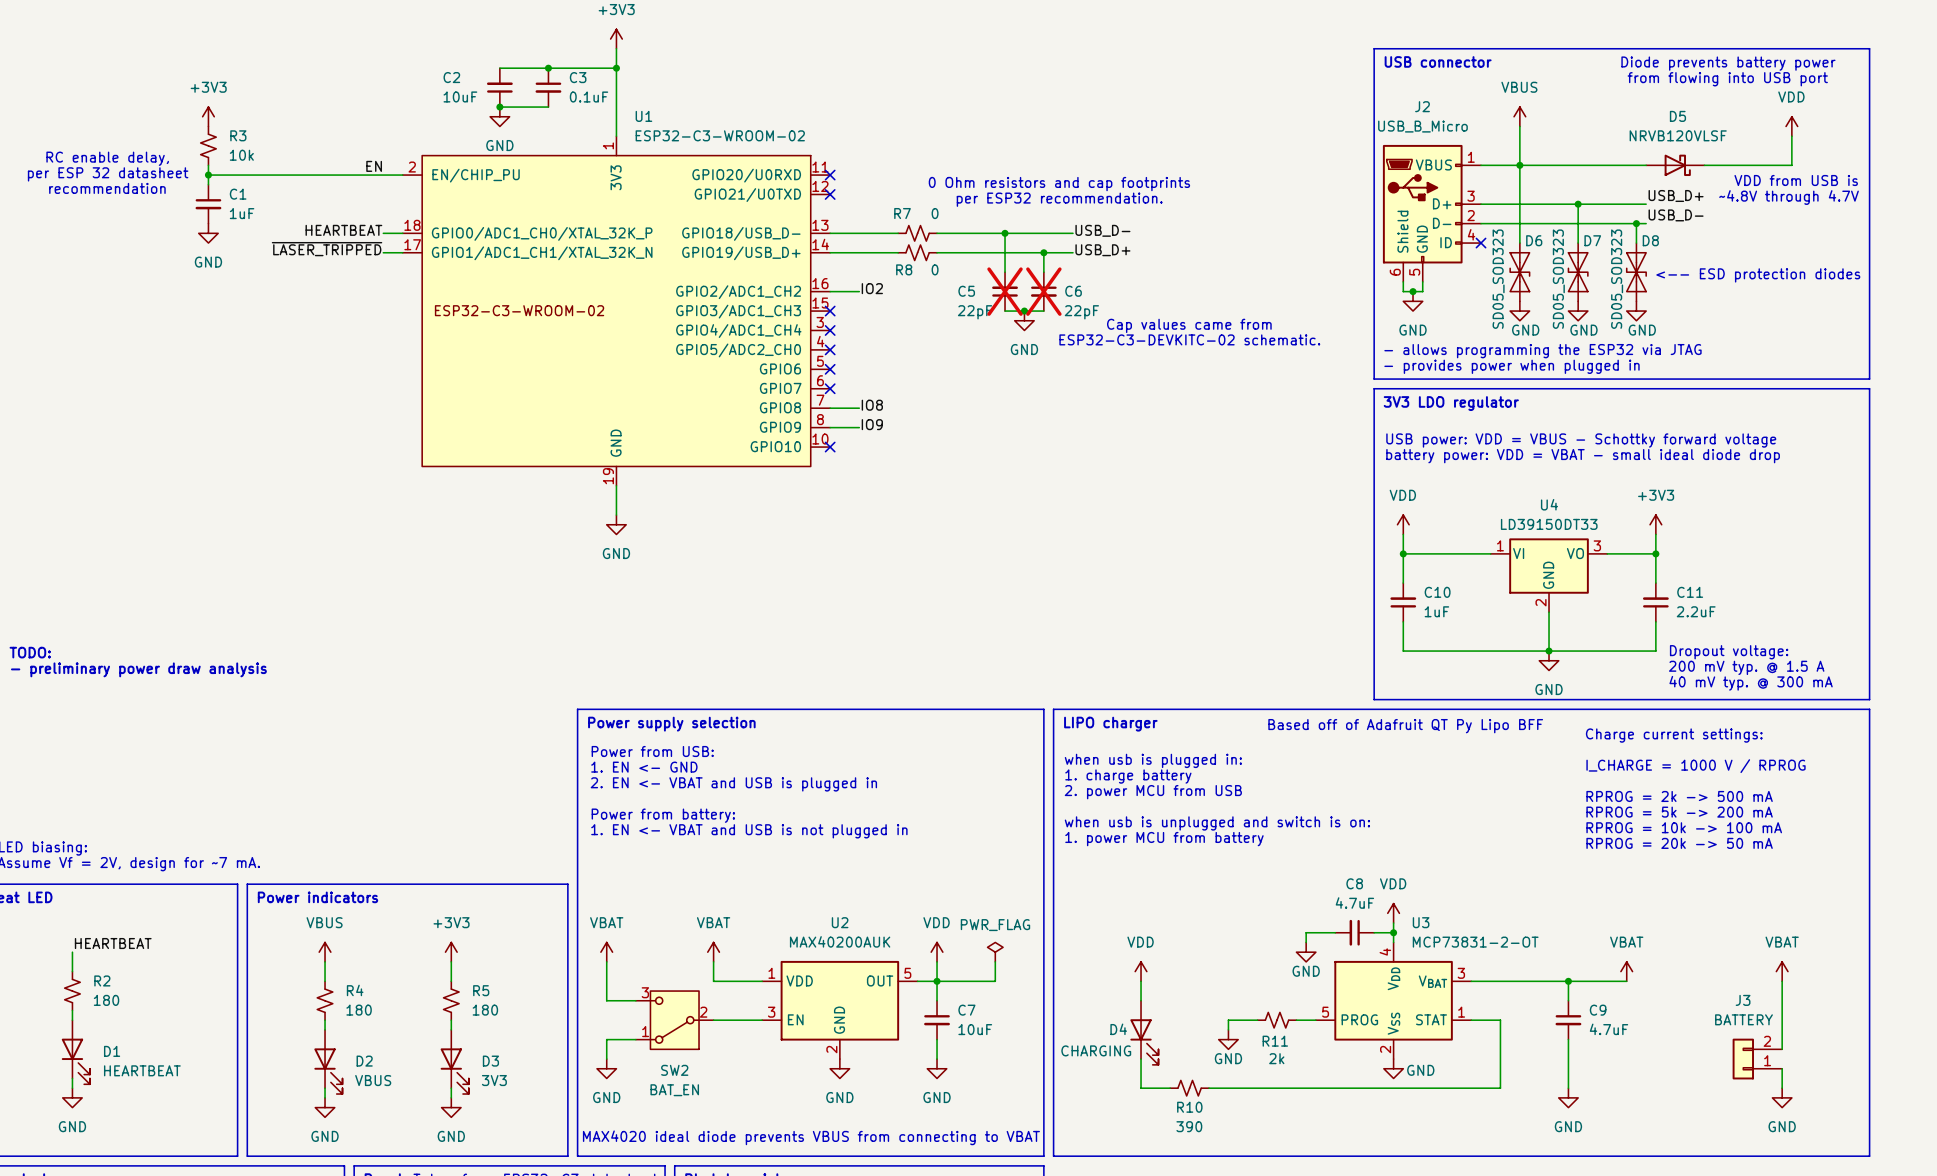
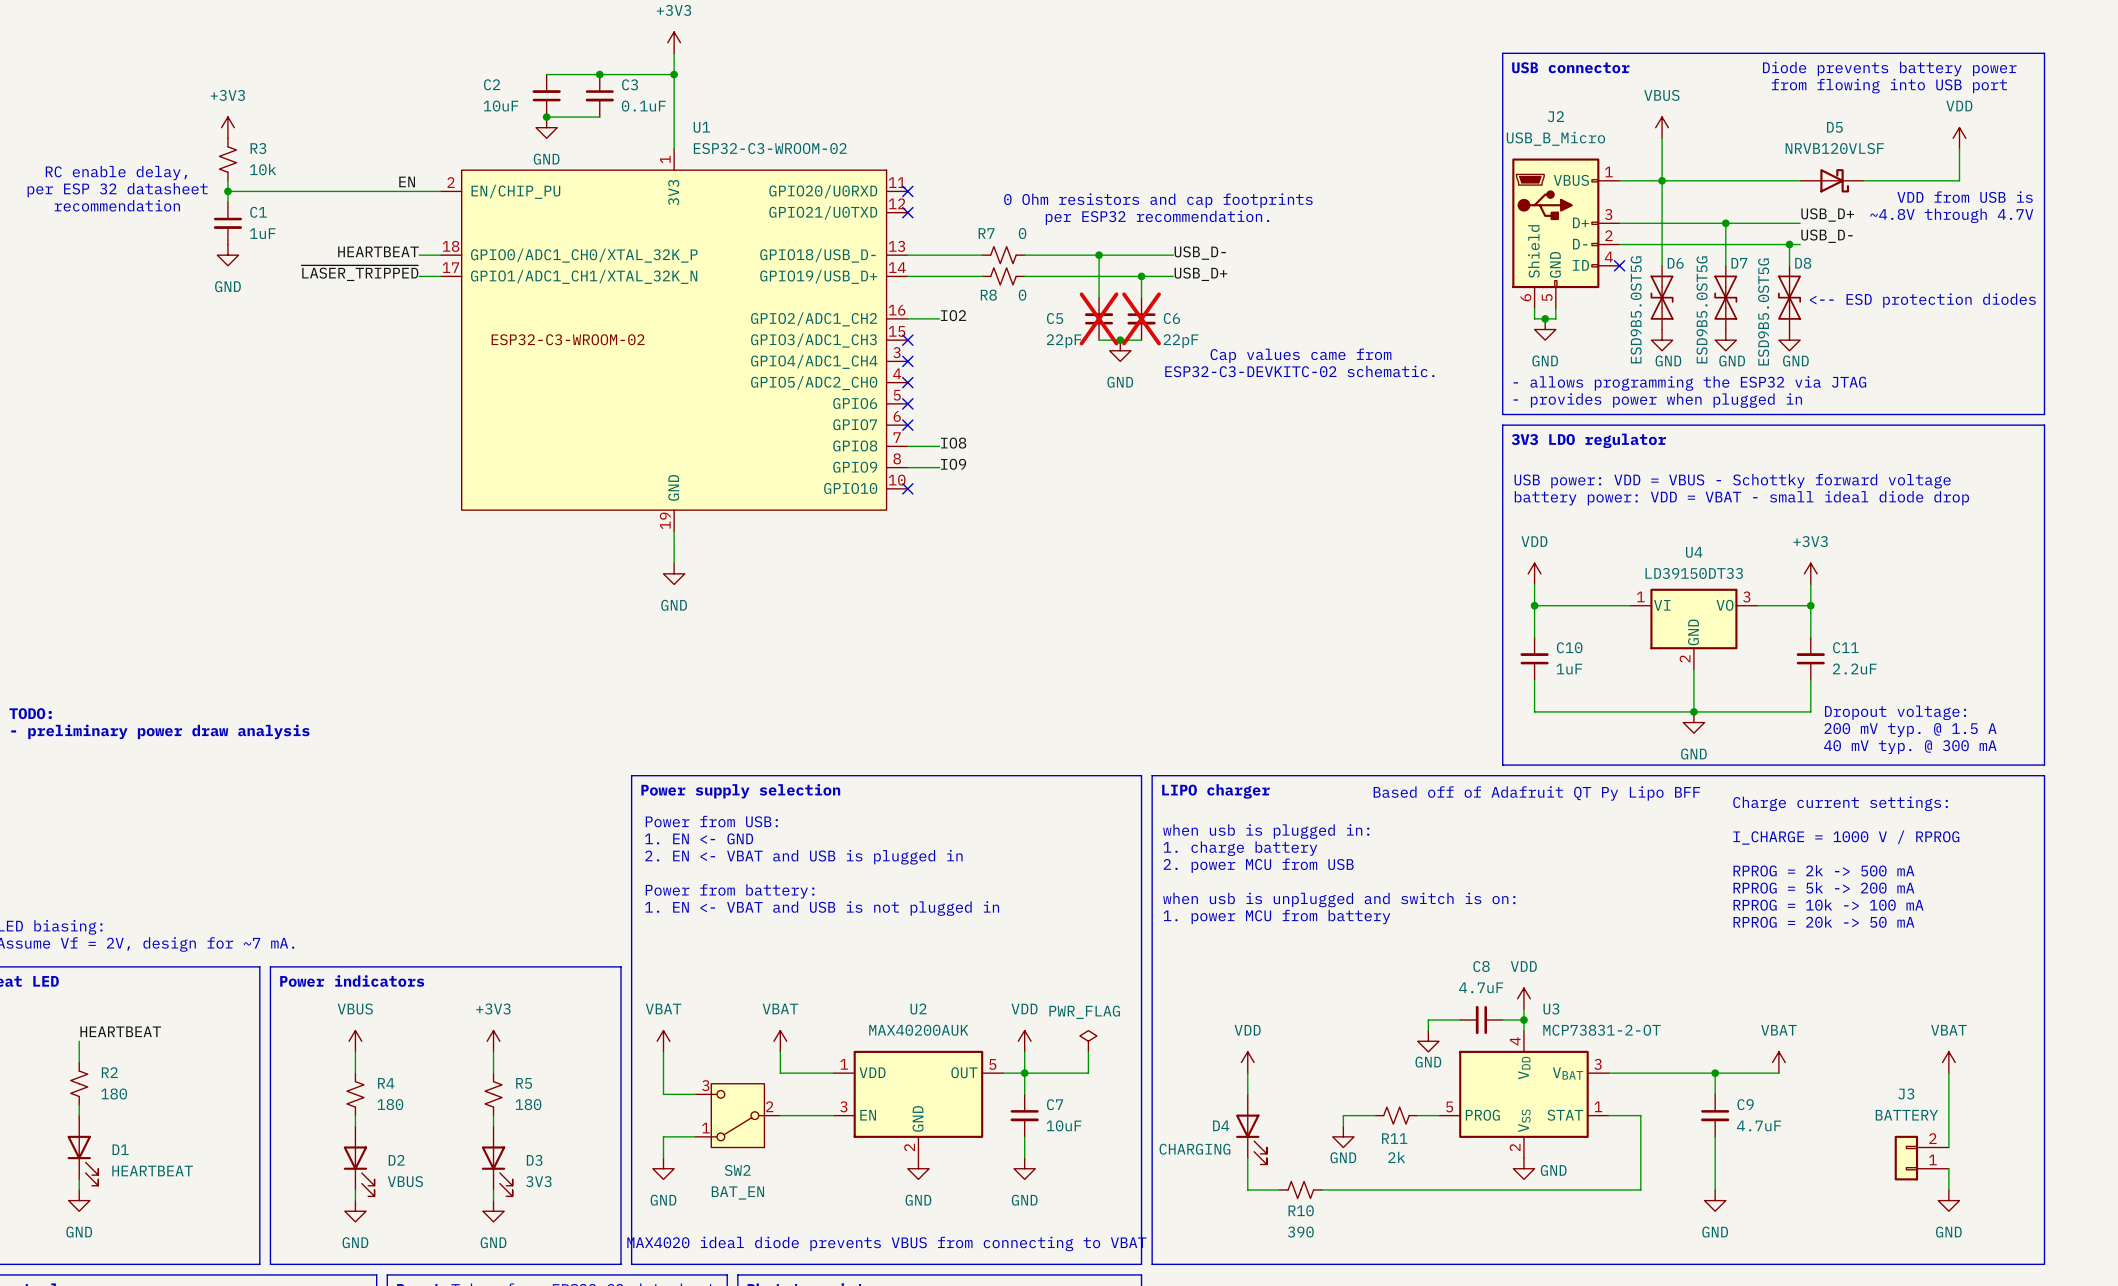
D6 value: SD05_SOD323 (1498, 279) -> ESD9B5.0ST5G (1636, 309)
D7 value: SD05_SOD323 (1558, 279) -> ESD9B5.0ST5G (1702, 309)
D8 value: SD05_SOD323 (1617, 279) -> ESD9B5.0ST5G (1763, 311)

